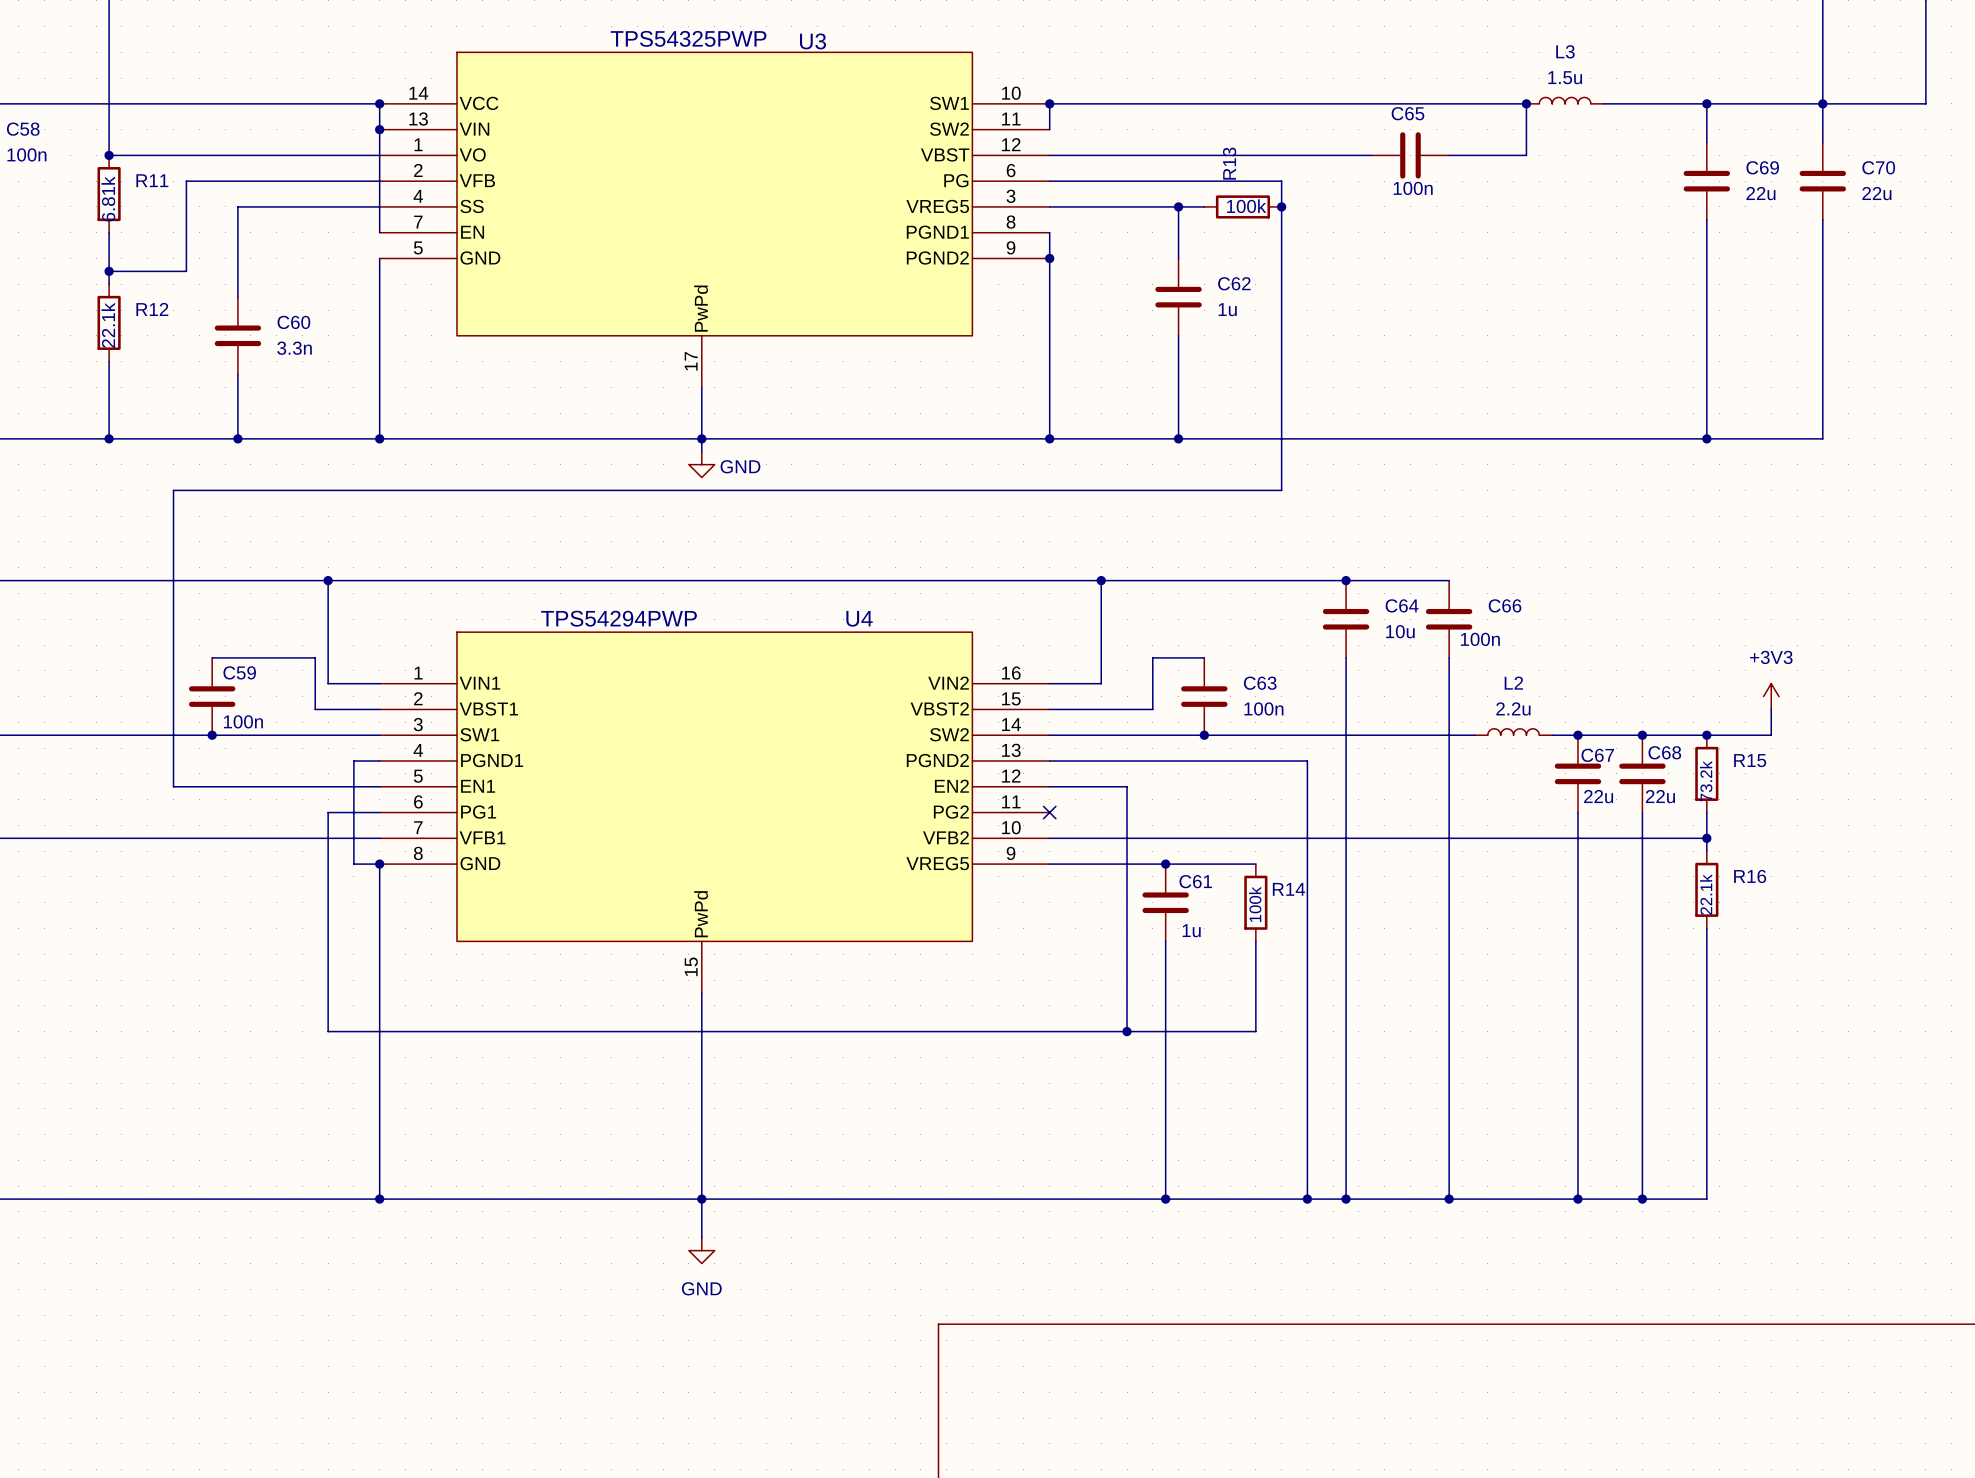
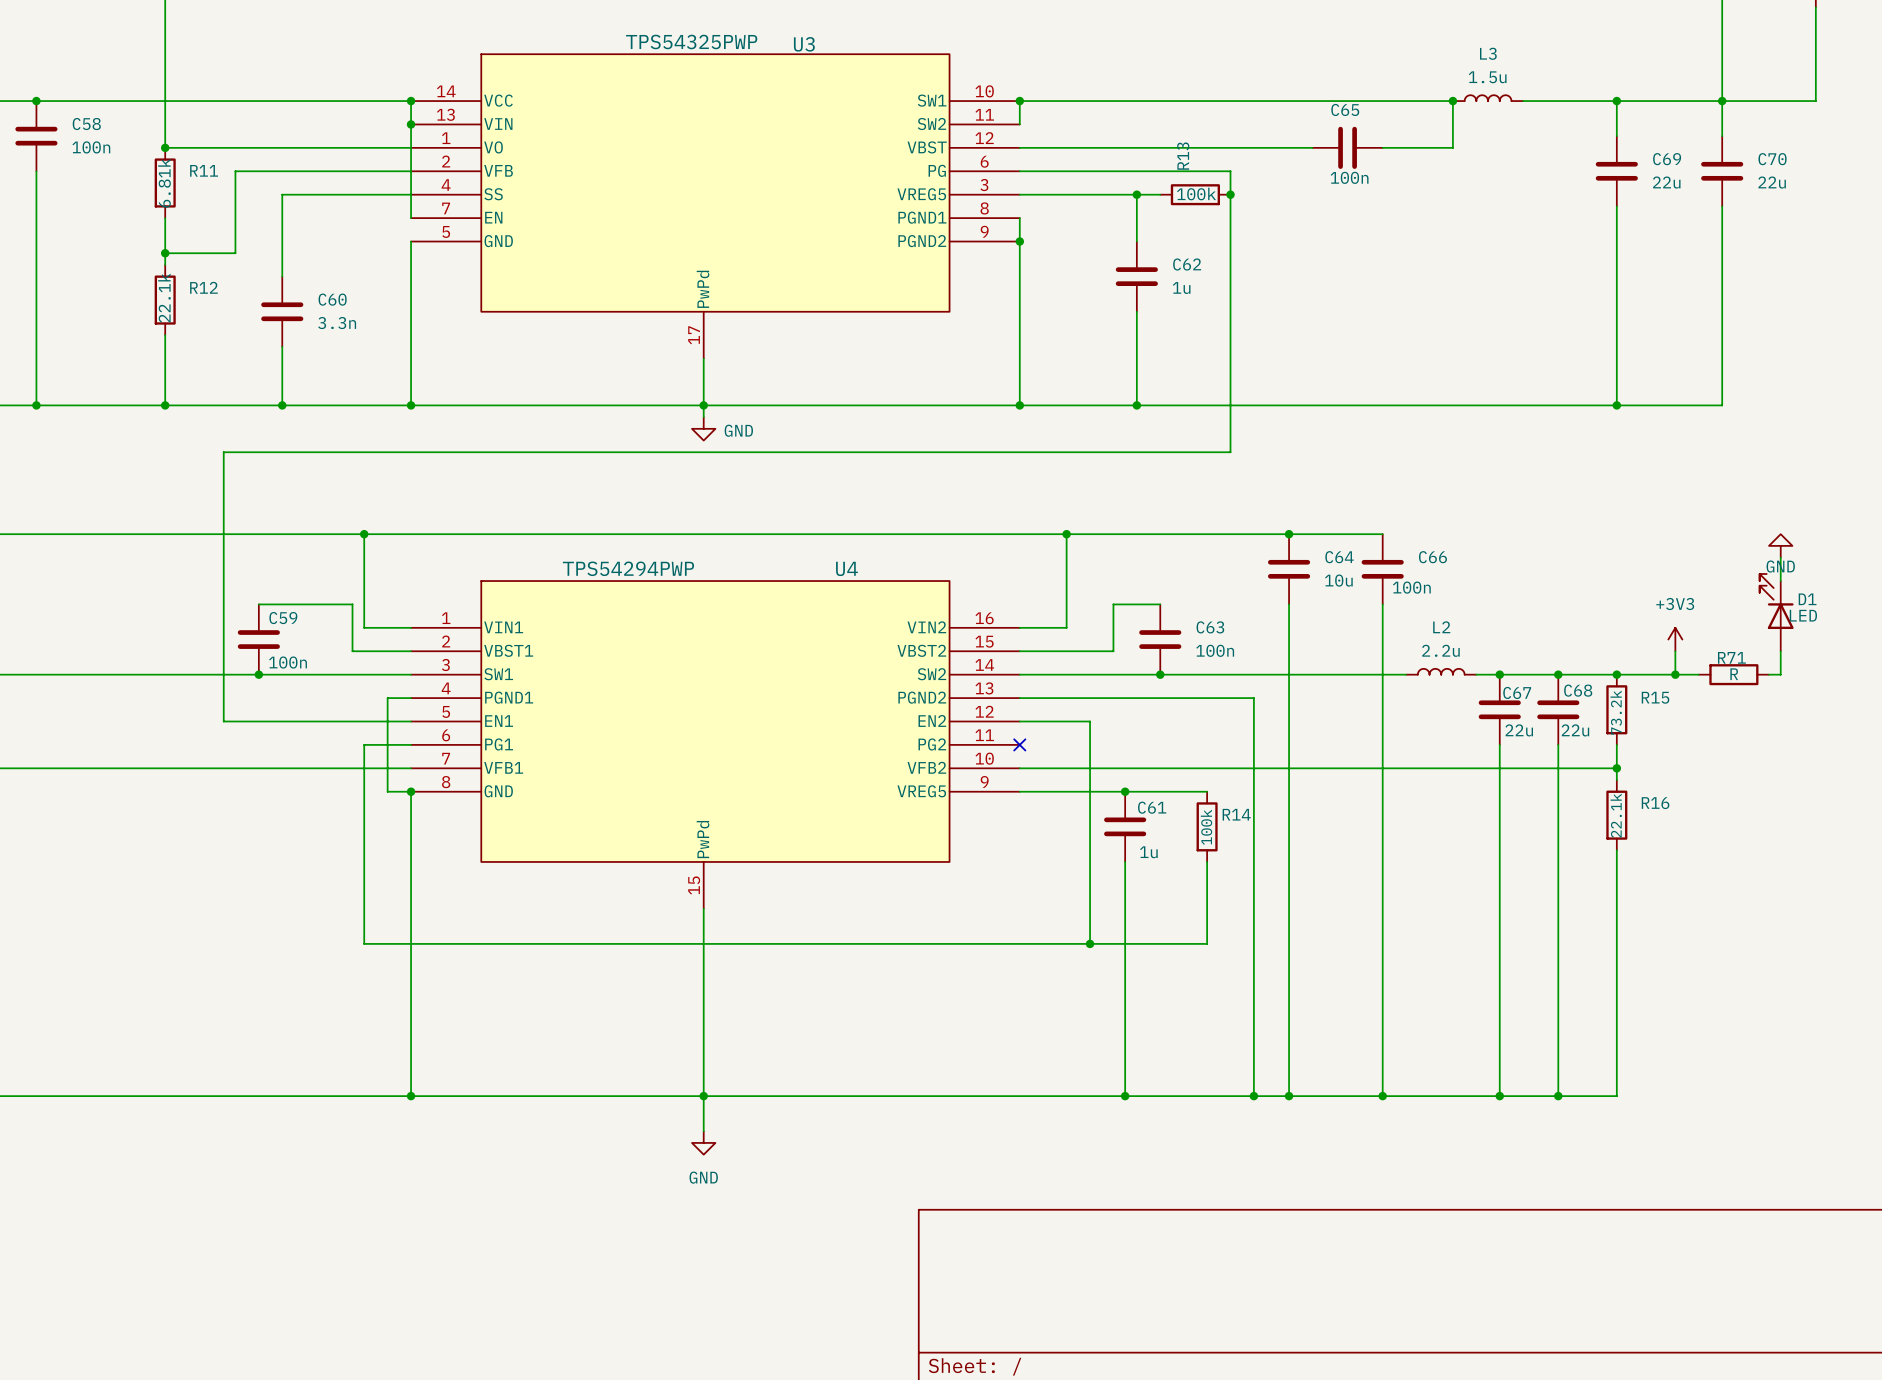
power symbol: none -> GND (1780, 545)
wire: none -> (1780, 557) (1780, 581)
D1: none -> LED (1776, 612)
wire: none -> (1780, 651) (1780, 674) (1769, 674)
wire: none -> (1675, 674) (1698, 674)
junction: none -> (1675, 674)
R71: none -> R (1733, 674)

